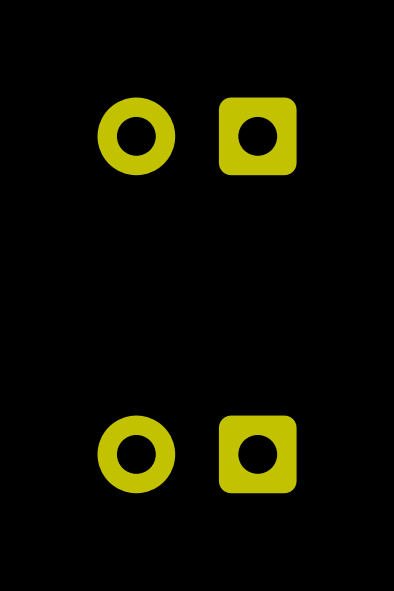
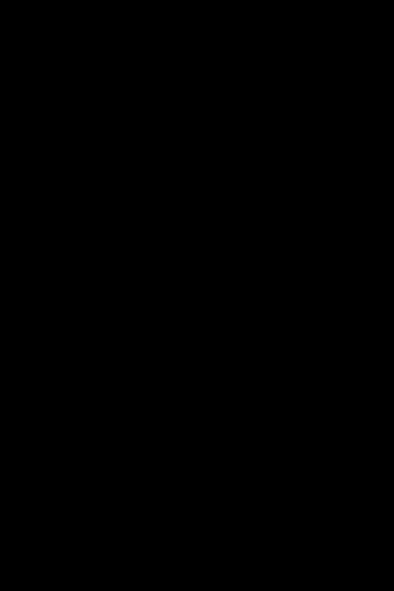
part: (197, 136) -> none
part: (197, 454) -> none

